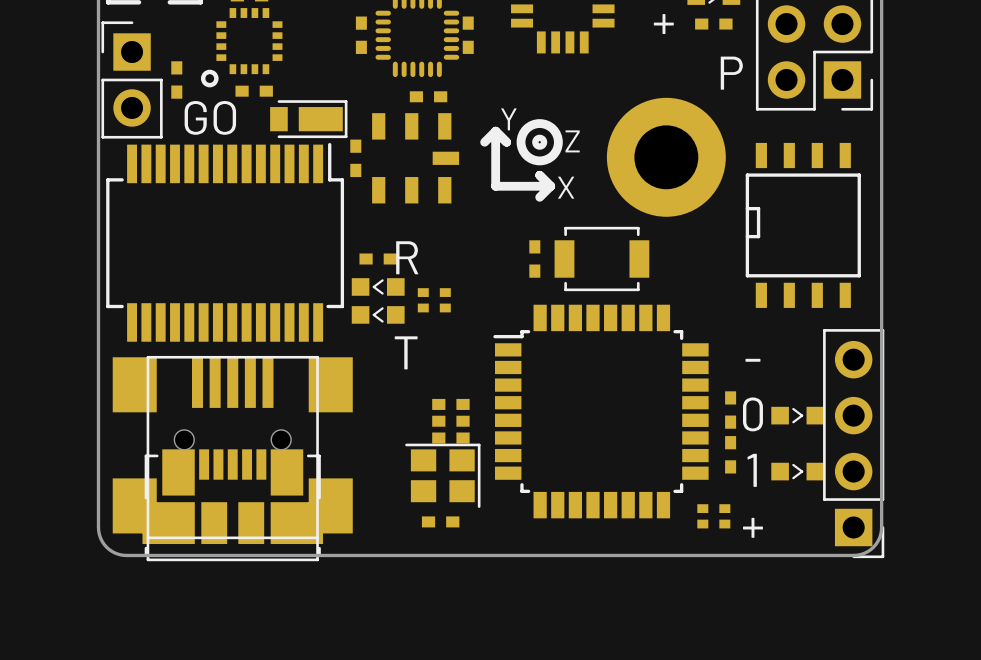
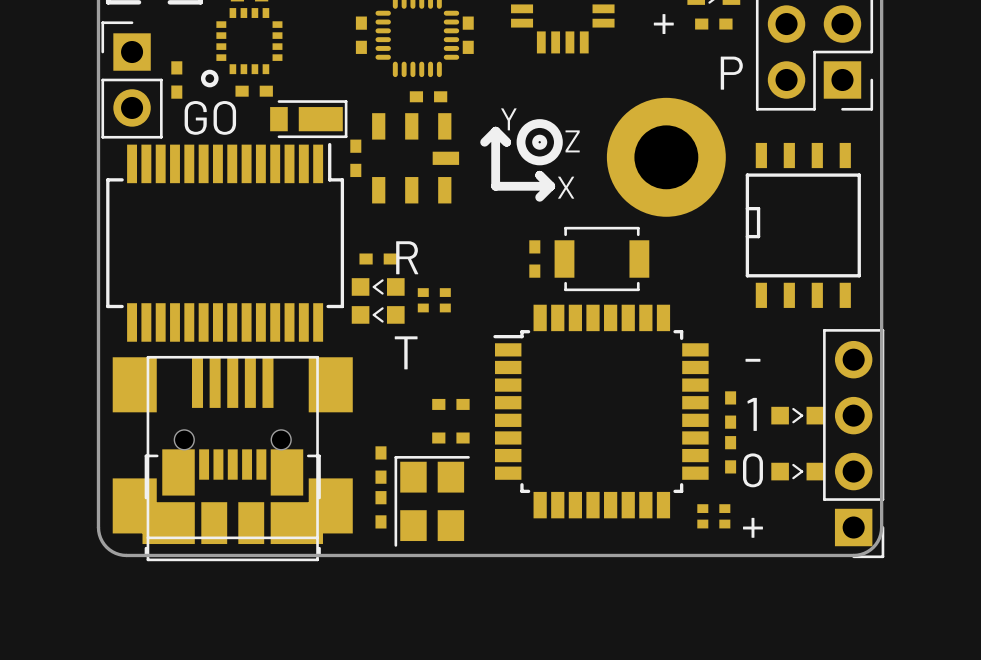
text: 0 (752, 414) -> 1 (752, 414)
part: (450, 421) -> none
part: none -> (380, 465)
text: 1 (752, 470) -> 0 (752, 470)
part: (442, 475) -> none
part: none -> (432, 501)
part: none -> (380, 509)
part: (440, 521) -> none

